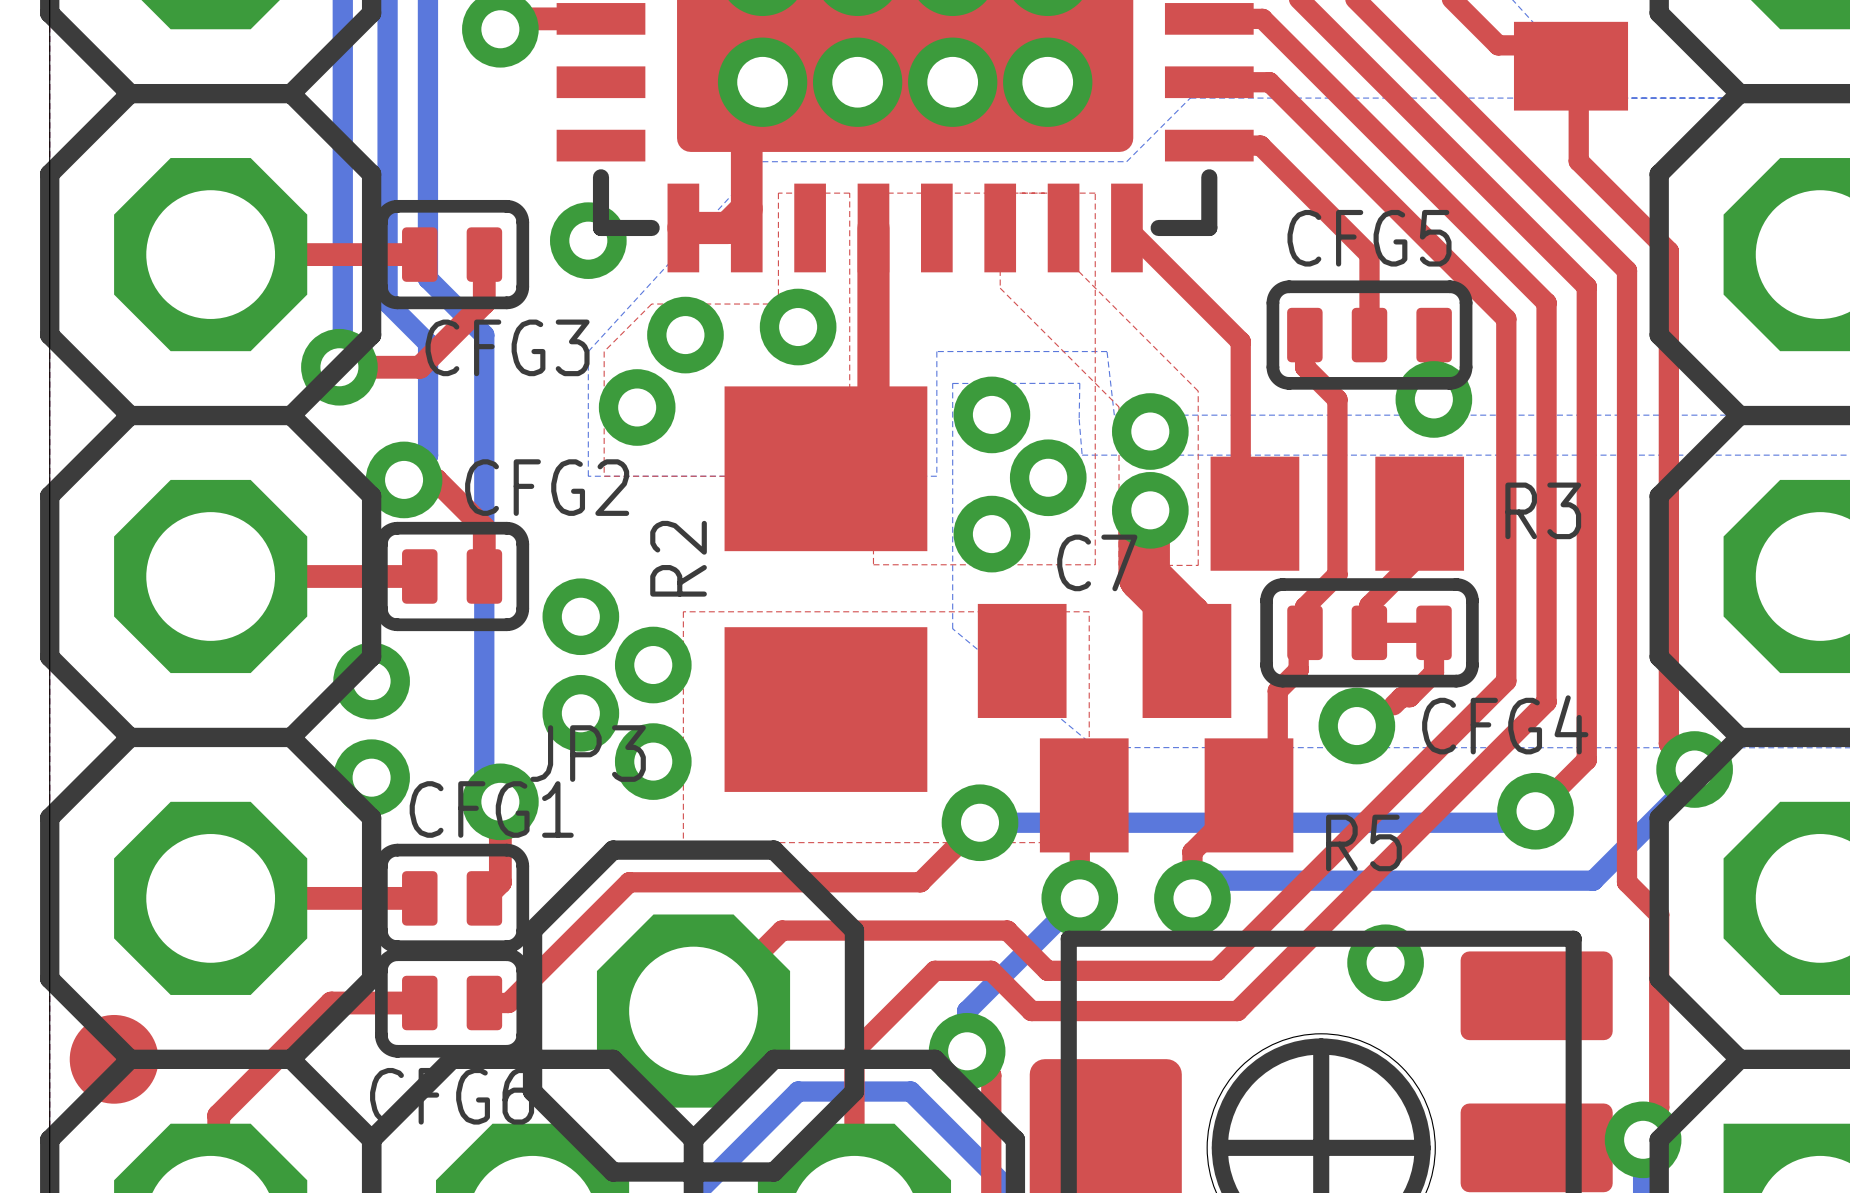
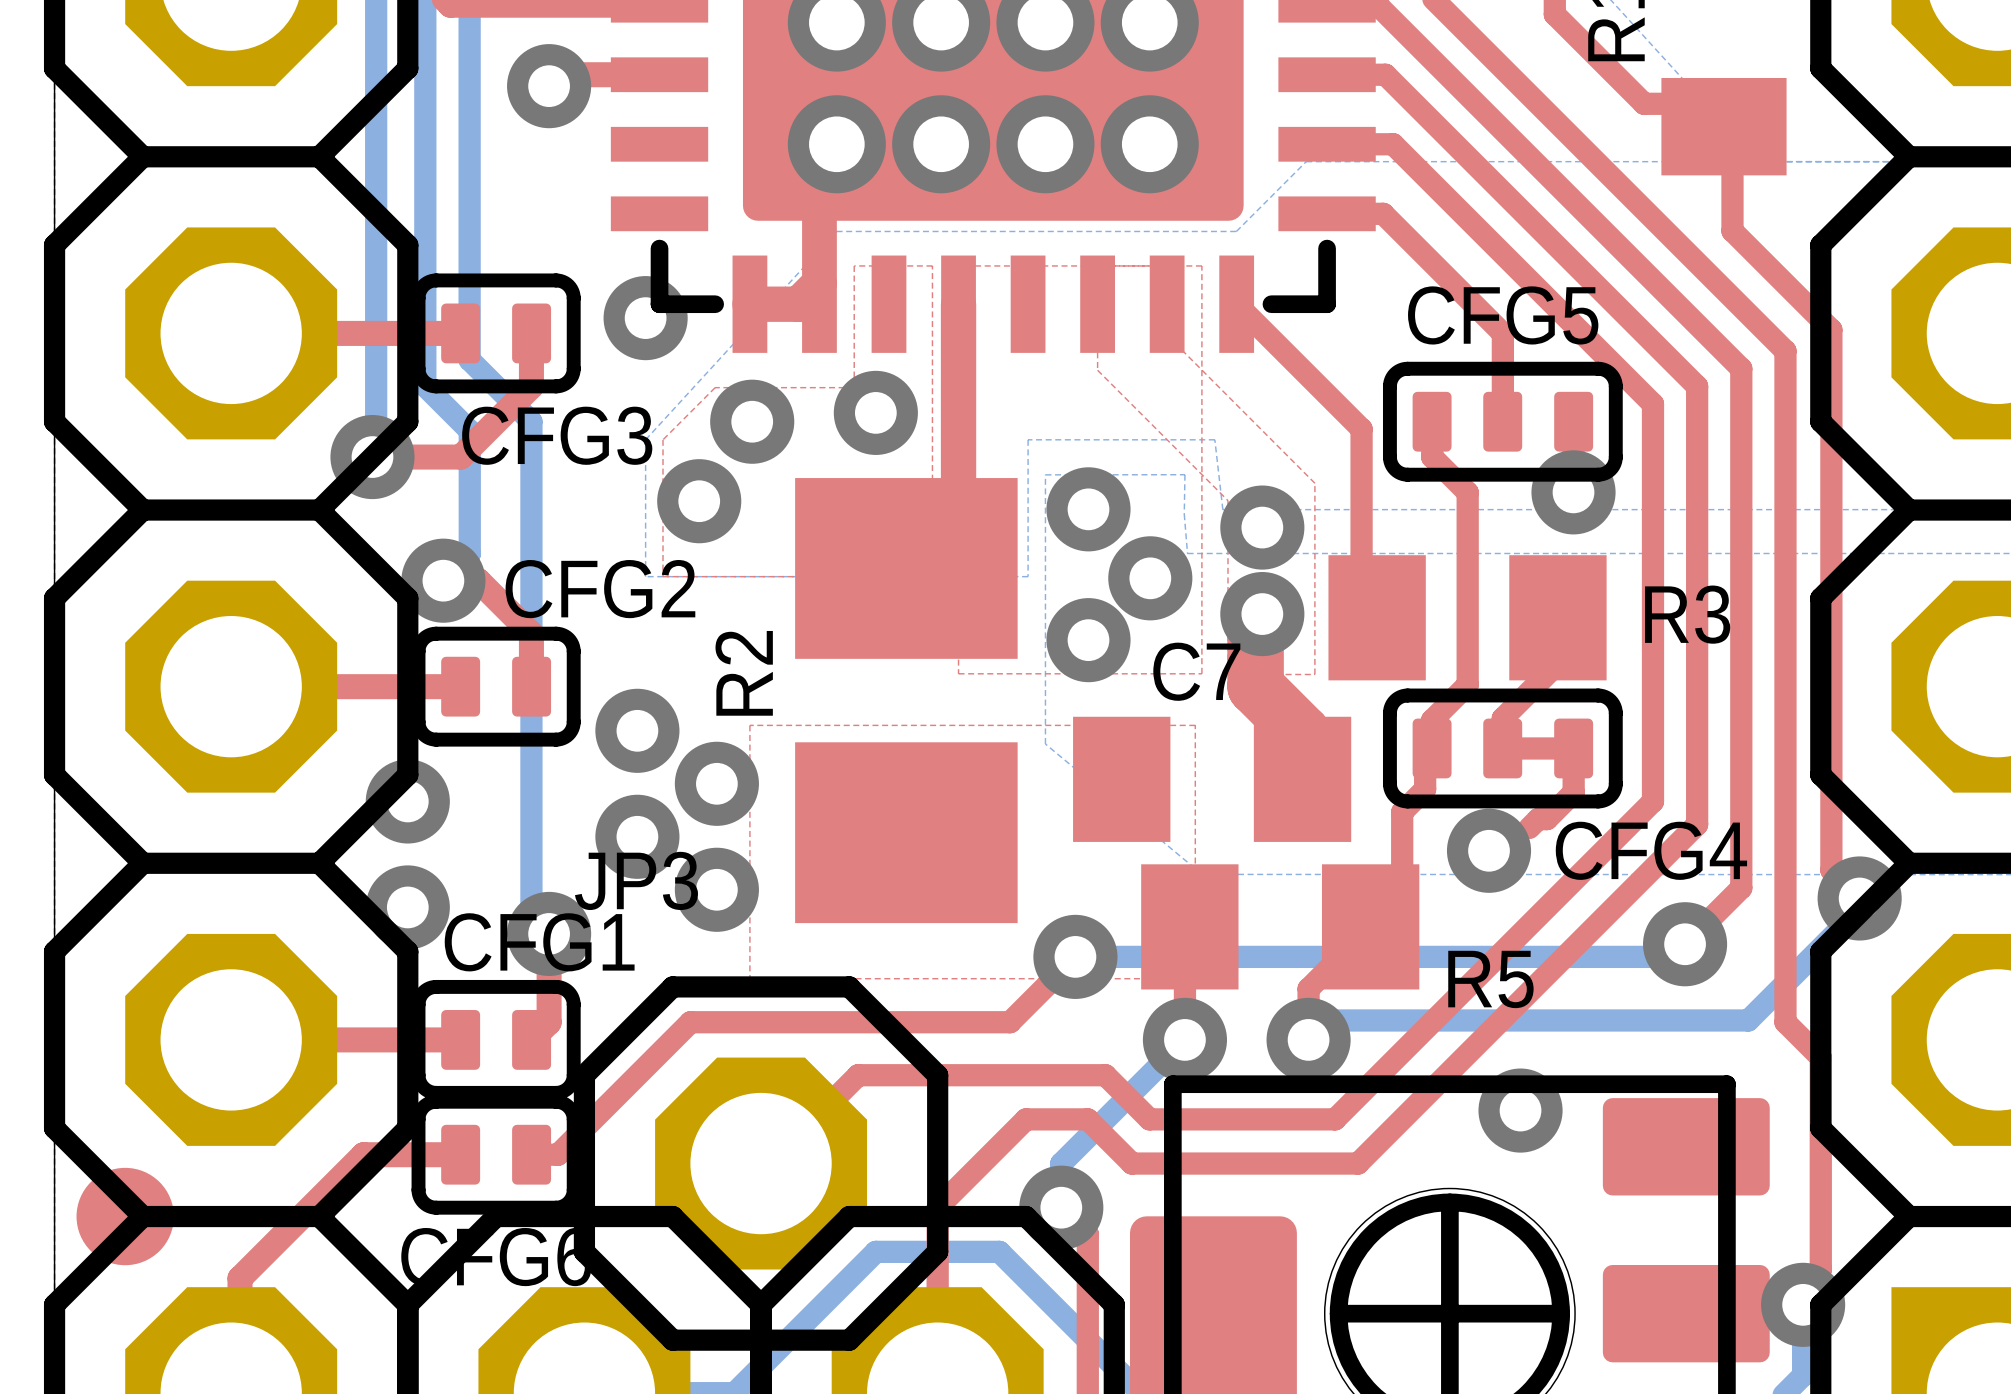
CFG5 footprint: [1266, 280, 1473, 390] -> [1382, 361, 1623, 482]

